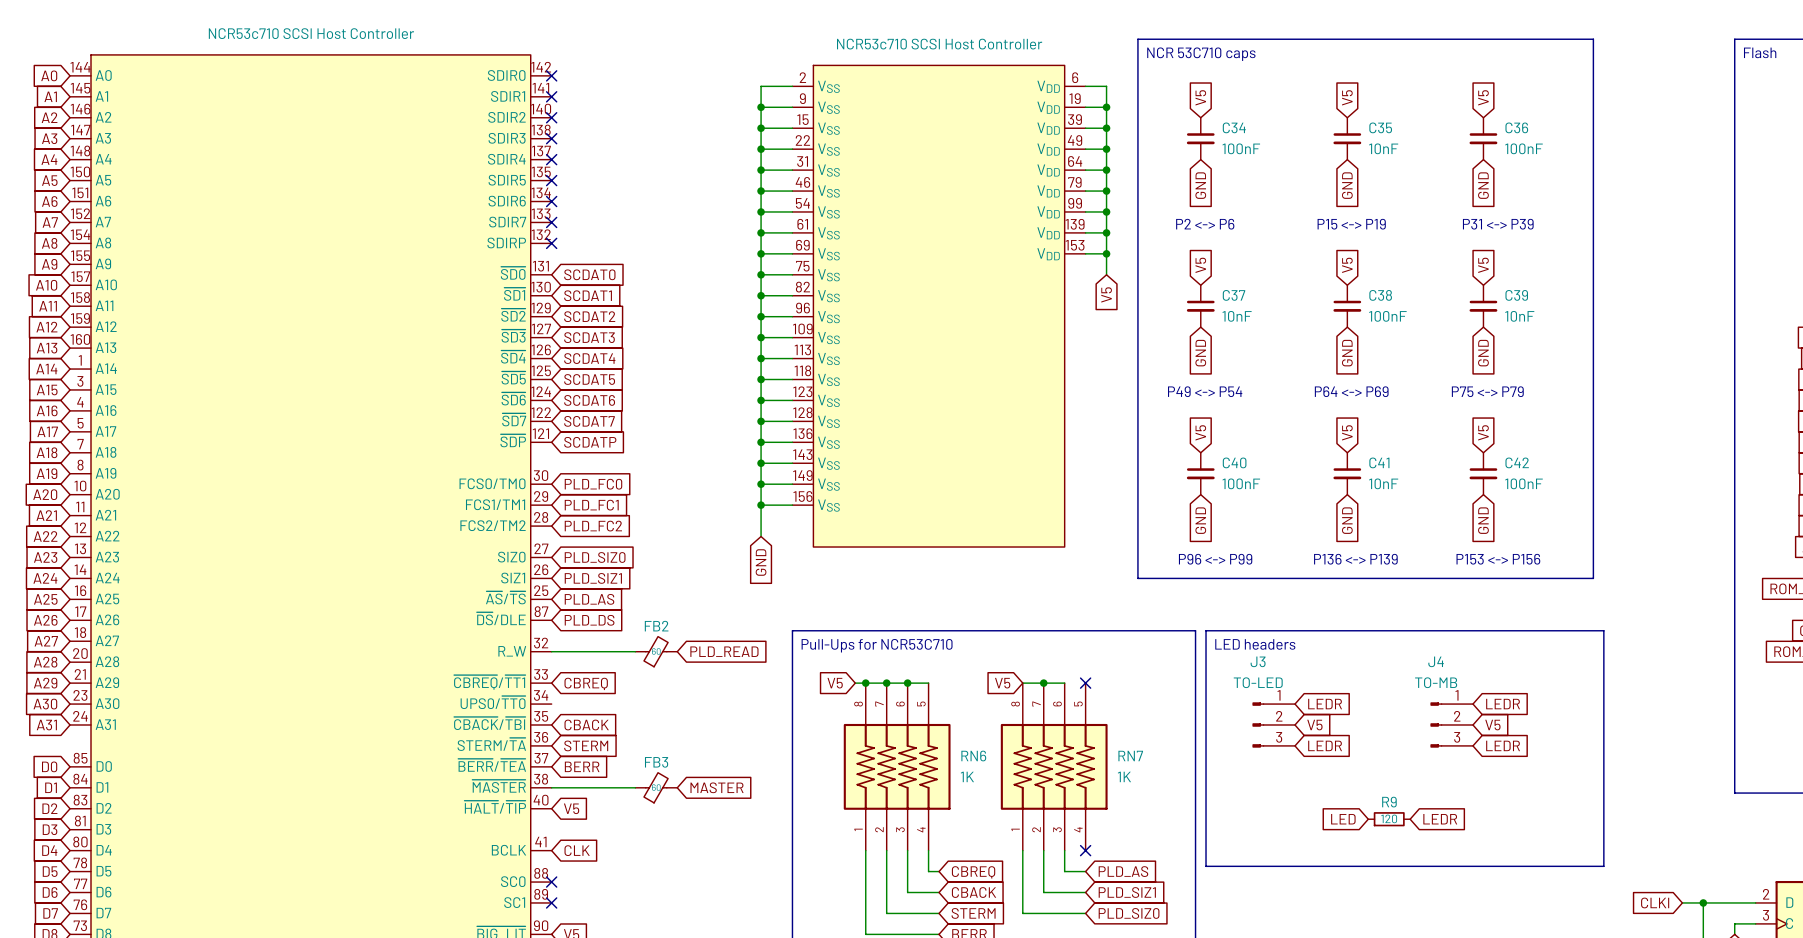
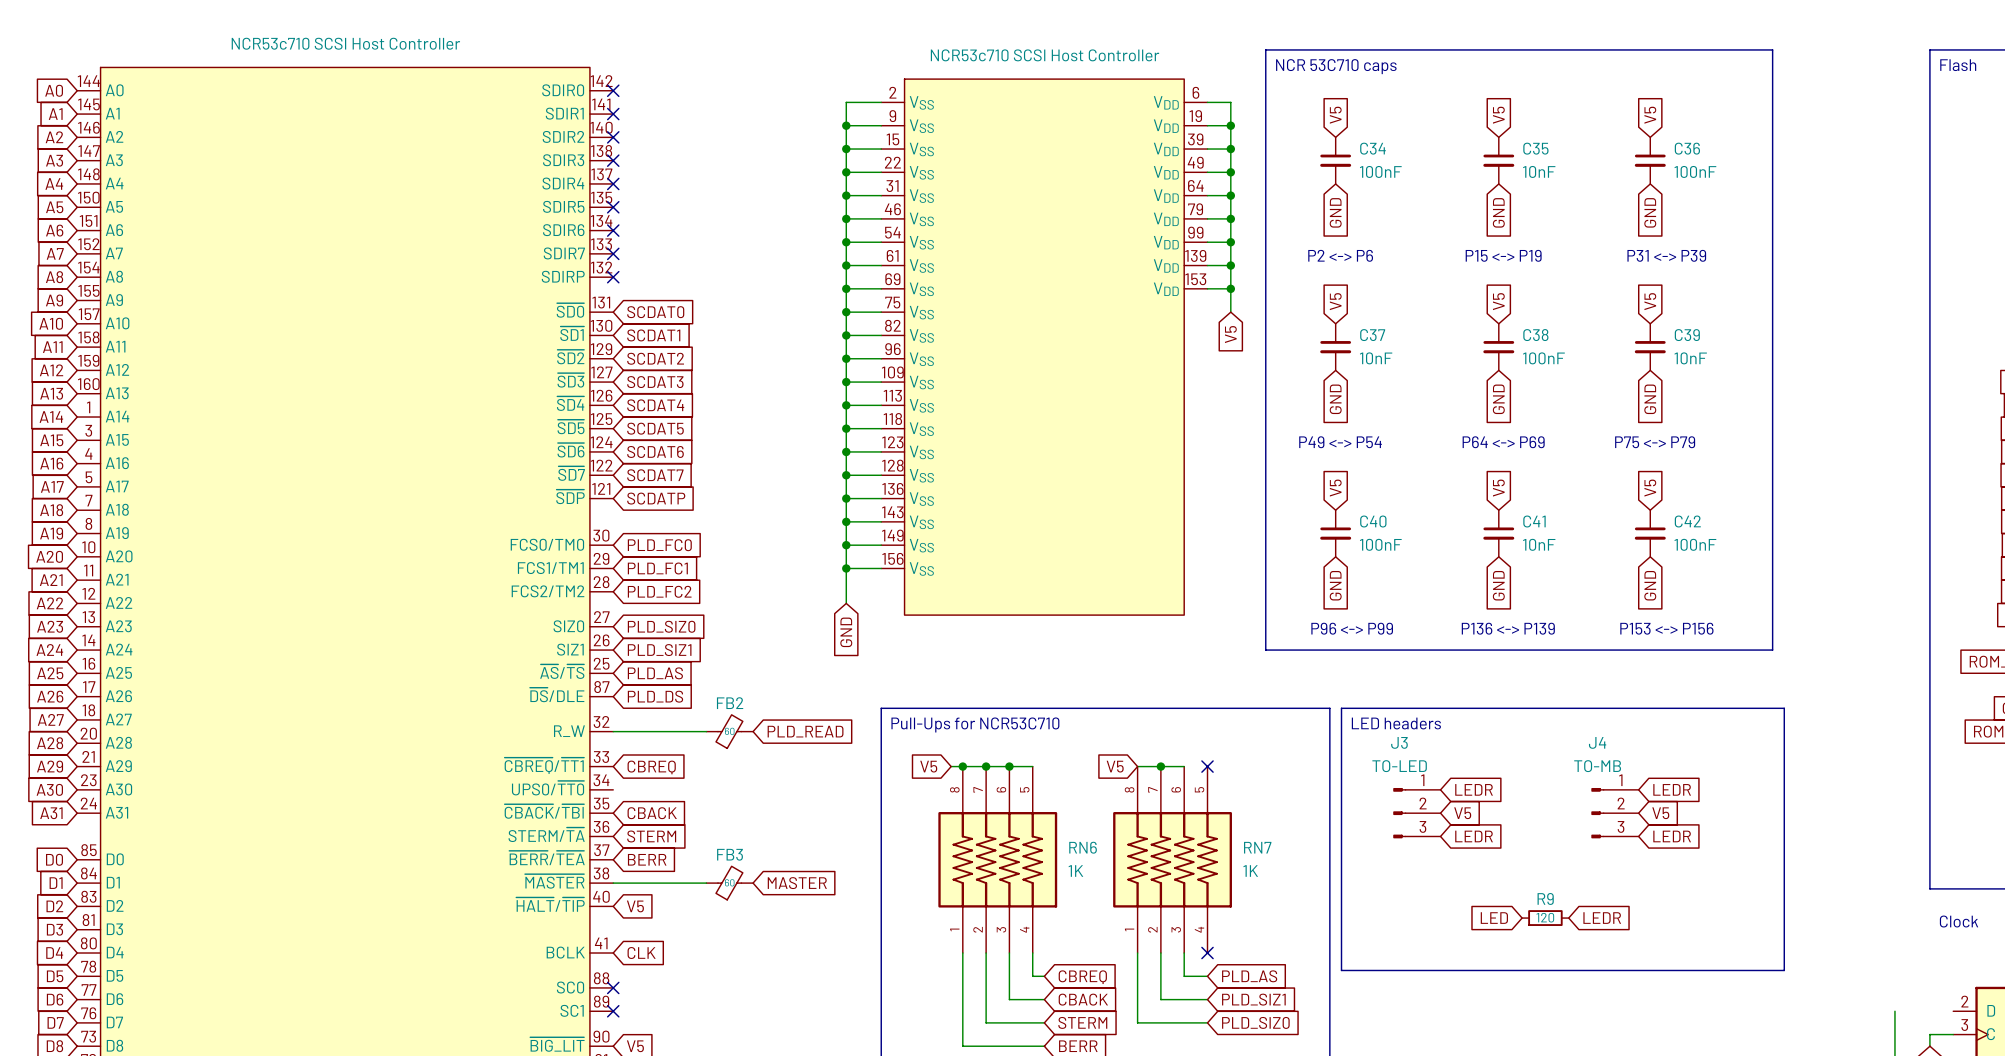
text: none -> Clock (1959, 921)
global label: CLKI (1655, 902) -> none
wire: (1682, 902) (1755, 902) -> none
junction: (1703, 902) -> none

